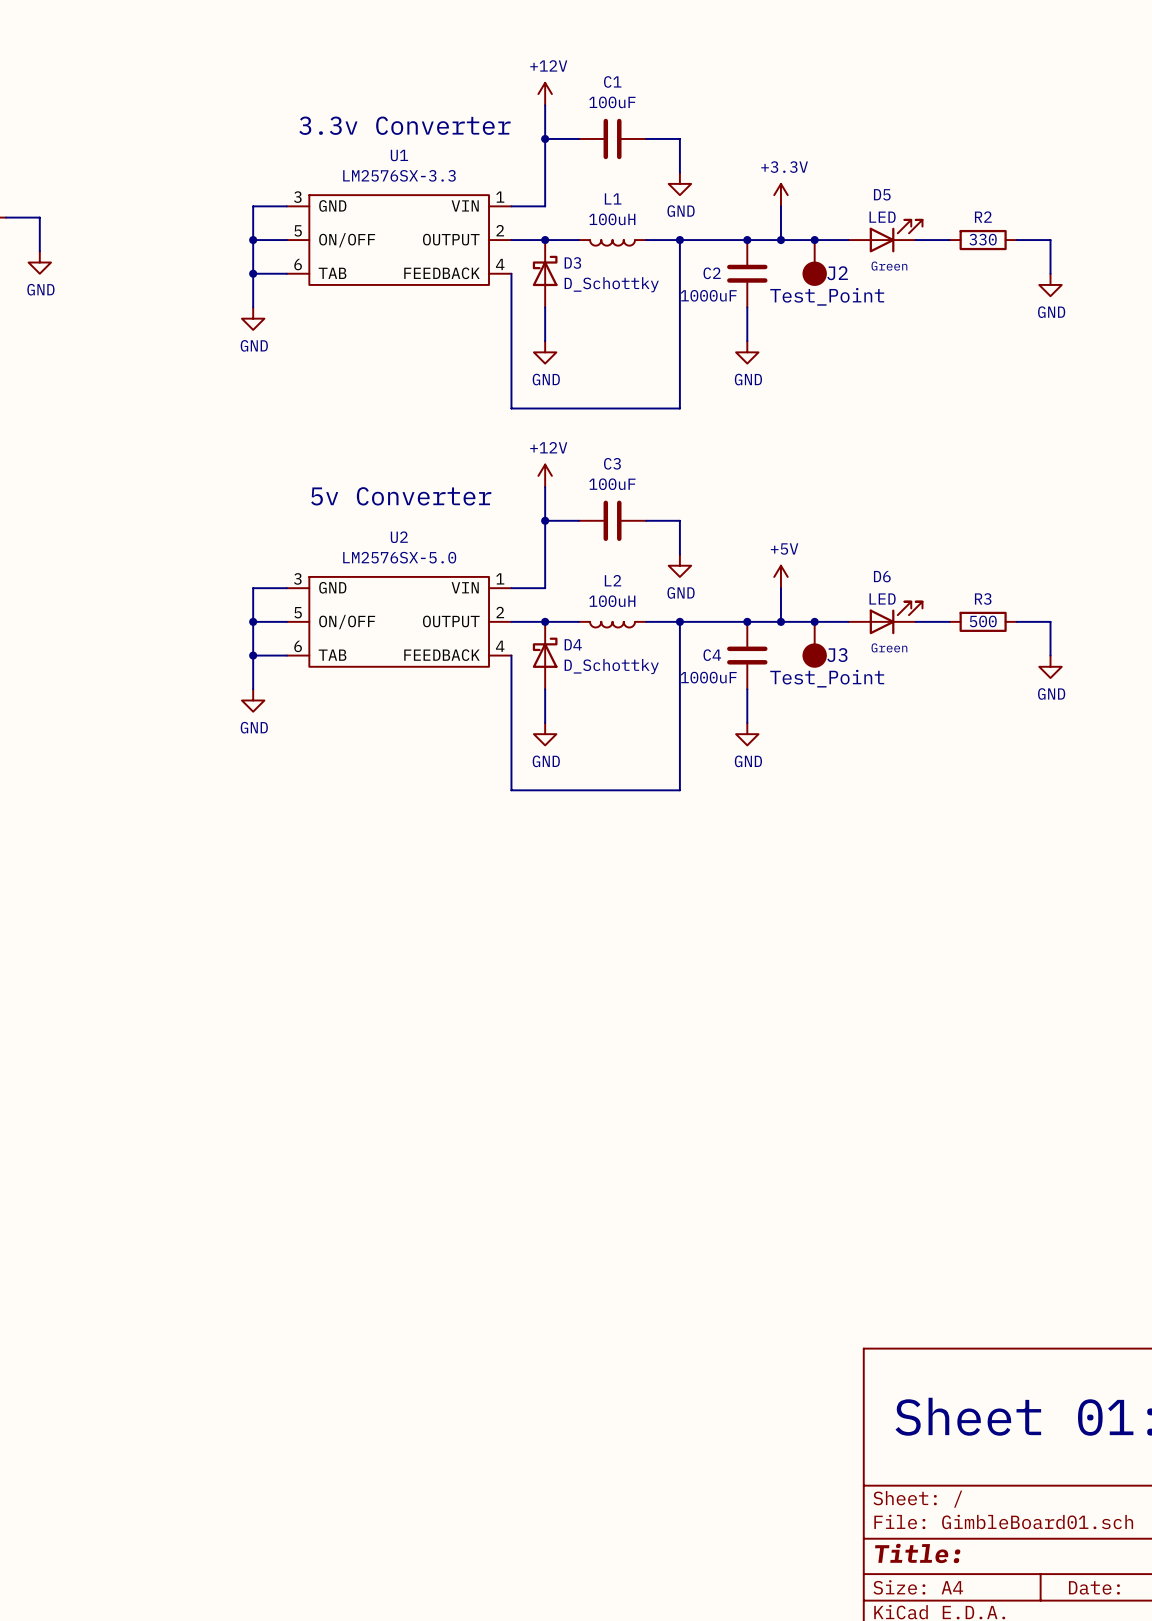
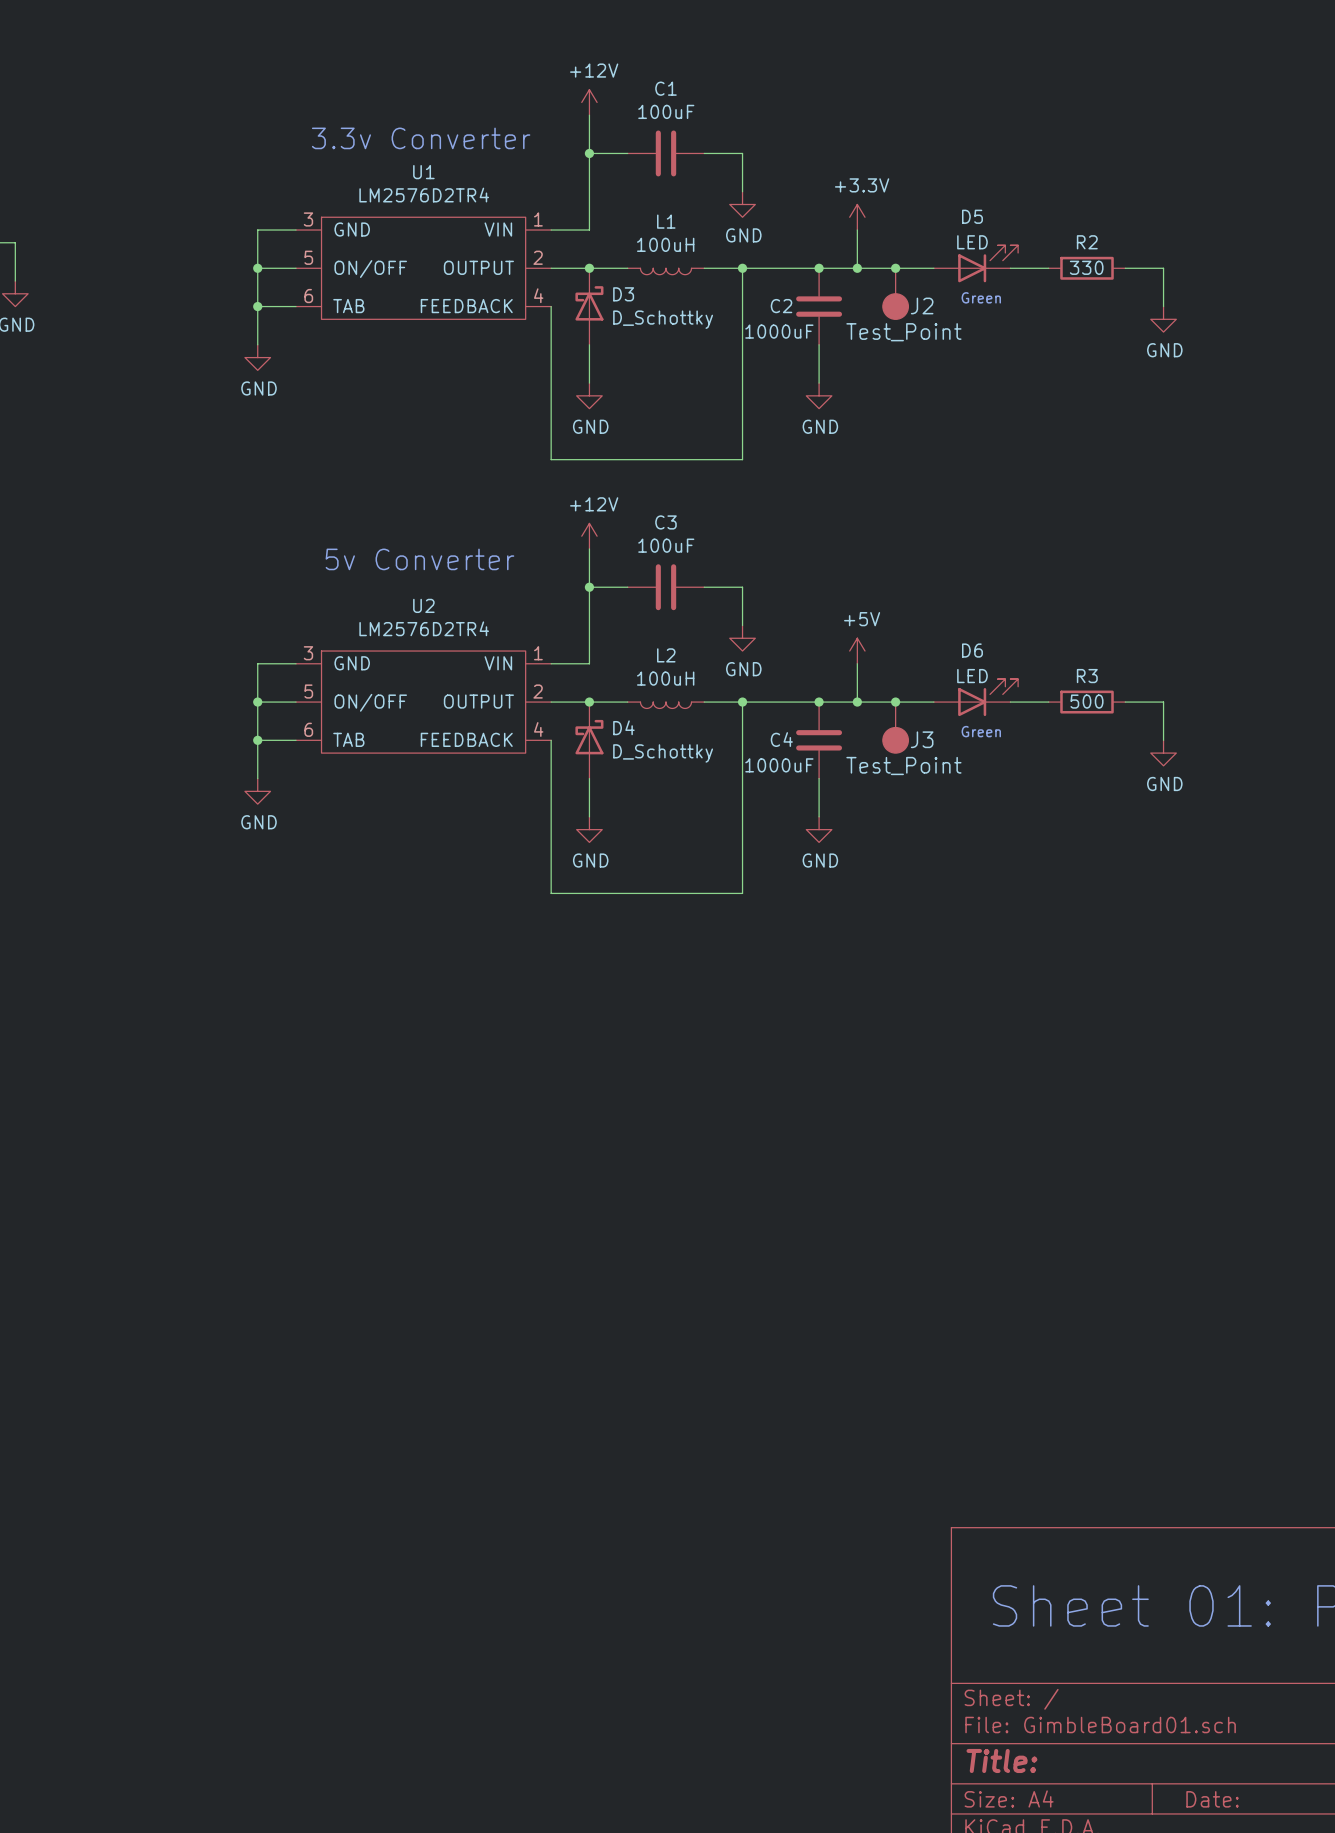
U1 value: LM2576SX-3.3 (399, 175) -> LM2576D2TR4 (424, 195)
U2 value: LM2576SX-5.0 (399, 557) -> LM2576D2TR4 (424, 628)

